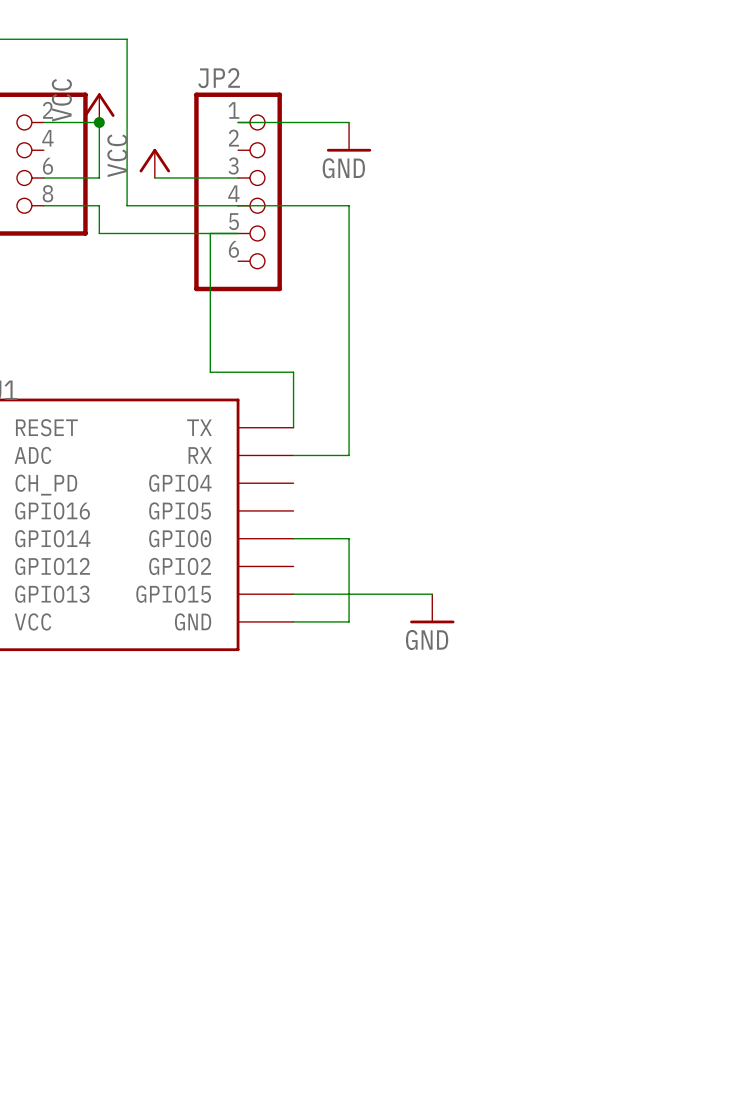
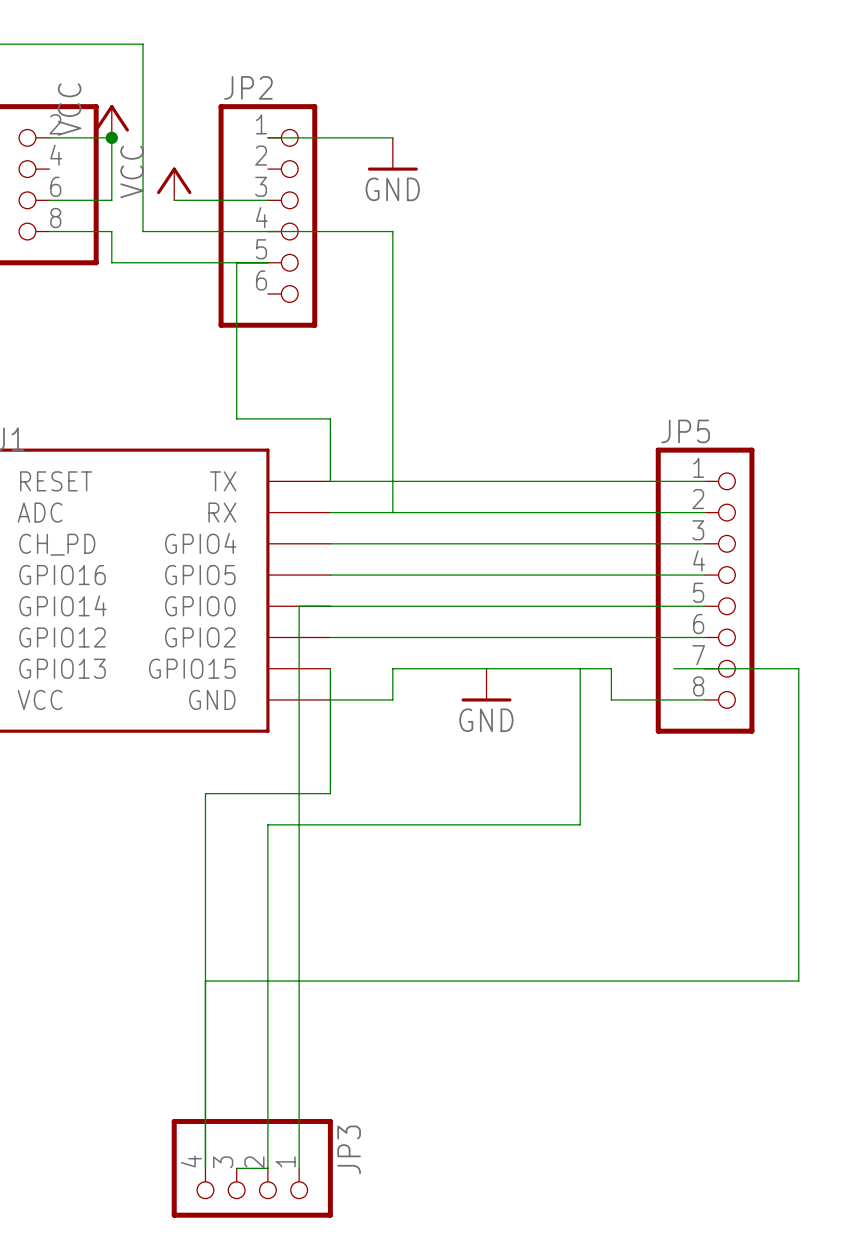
wire: none -> (330, 481) (705, 481)
wire: none -> (392, 512) (705, 512)
wire: none -> (330, 543) (705, 543)
wire: none -> (330, 575) (705, 575)
JP5: none -> (705, 590)
wire: none -> (330, 606) (299, 606) (299, 1168)
wire: (349, 538) (349, 594) (293, 594) -> (392, 606) (705, 606)
wire: none -> (330, 637) (705, 637)
wire: none -> (330, 668) (330, 793) (205, 793) (205, 1168)
wire: none -> (486, 668) (611, 668) (611, 699) (705, 699)
wire: none -> (580, 668) (580, 824) (267, 824) (267, 1168) (236, 1168)
wire: none -> (673, 668) (798, 668) (798, 980) (205, 980)
JP3: none -> (252, 1168)

